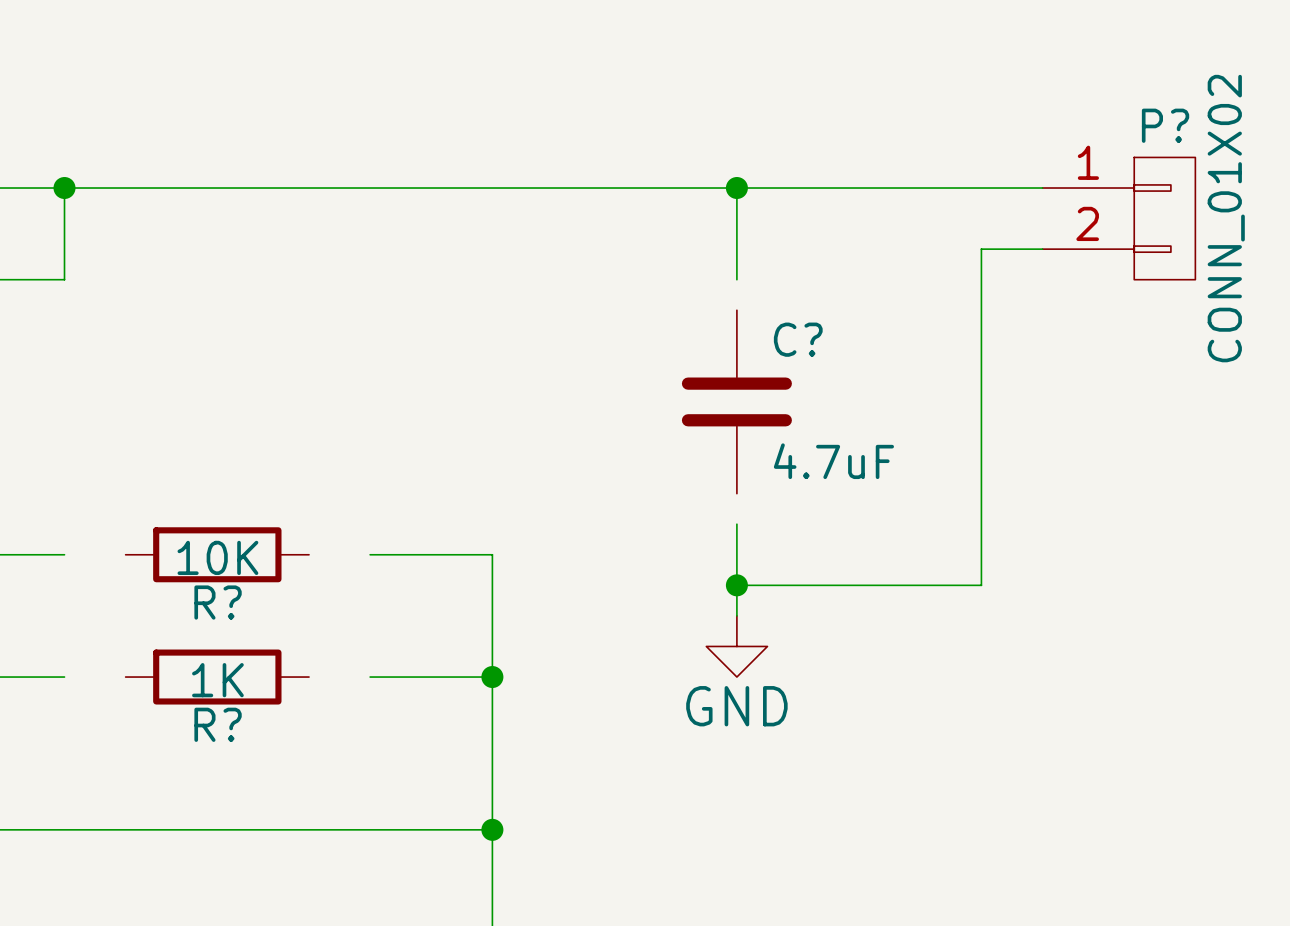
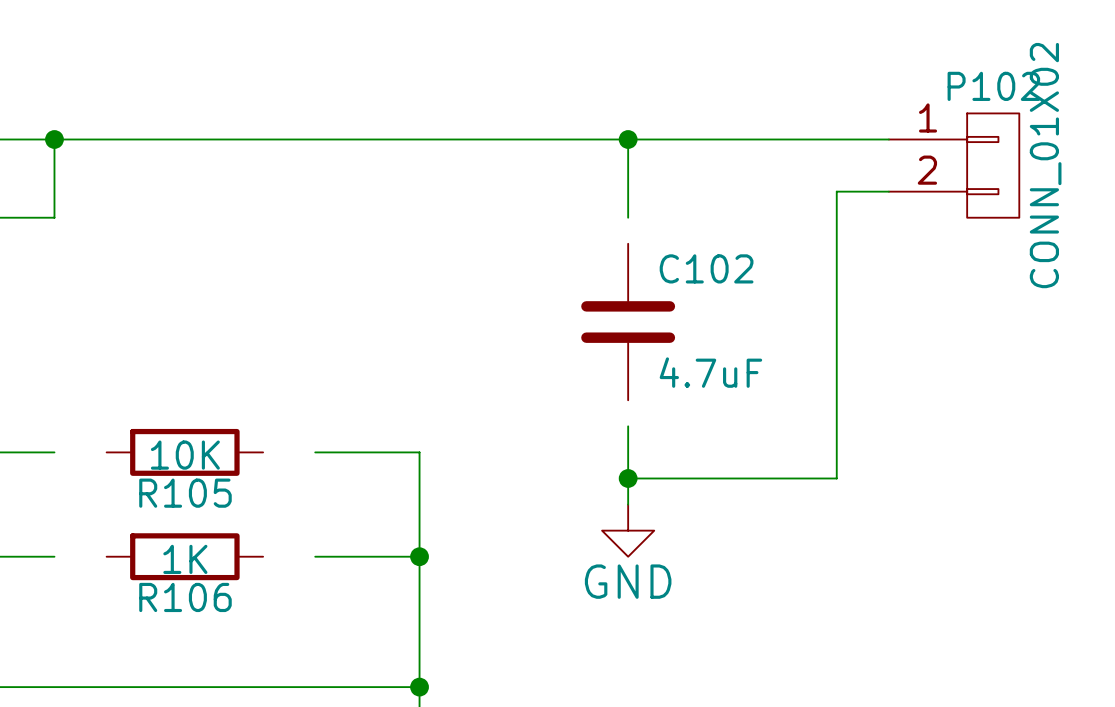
P? name: P? (1165, 125) -> P102 (993, 86)
C? name: C? (798, 339) -> C102 (706, 268)
R? name: R? (218, 602) -> R105 (185, 493)
R? name: R? (218, 724) -> R106 (185, 597)

